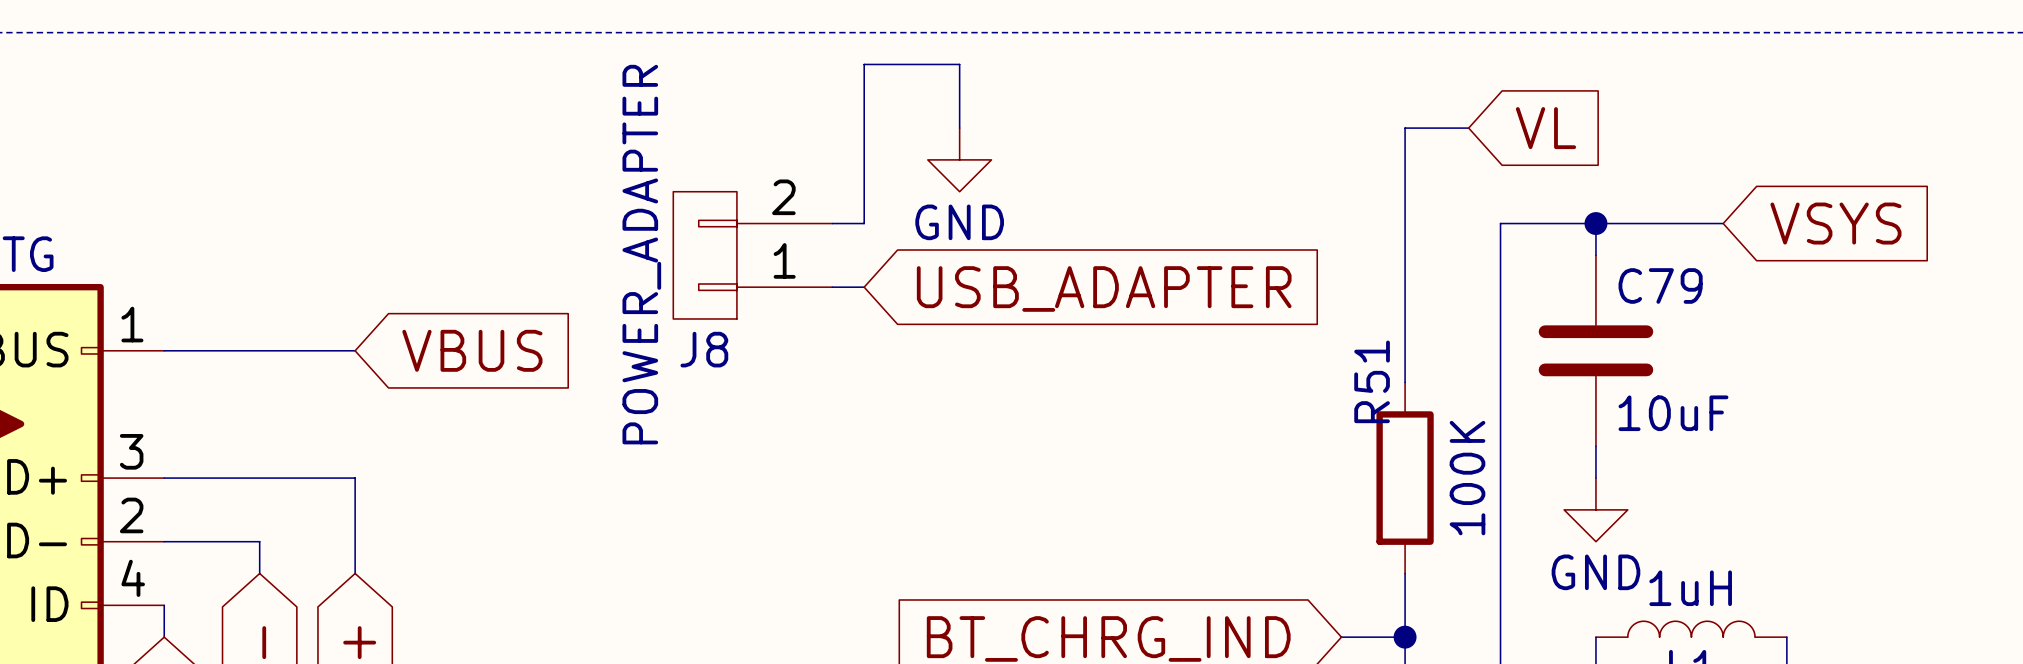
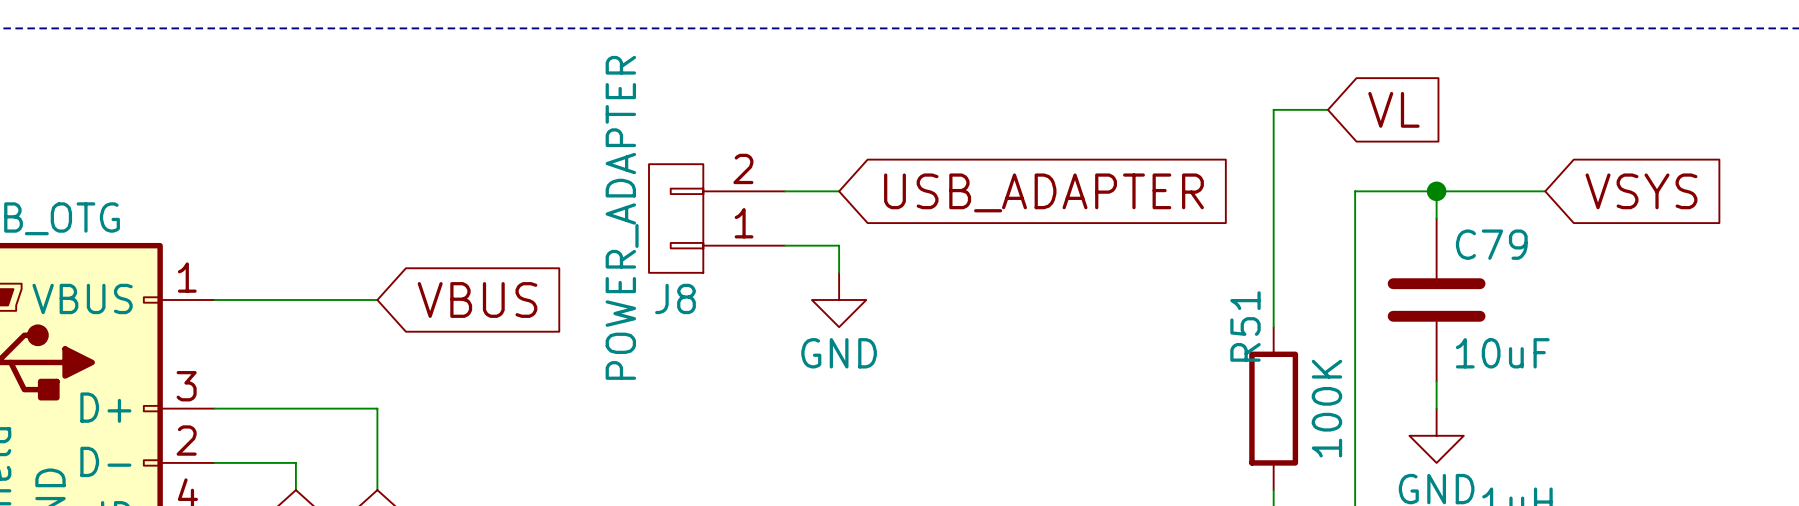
wire: (959, 128) (959, 64) (864, 64) (864, 223) -> (839, 191) (811, 191)
power symbol position: GND (959, 159) -> GND (839, 299)
wire: none -> (811, 245) (839, 245) (839, 272)
global label position: USB_ADAPTER (1104, 288) -> USB_ADAPTER (1043, 192)

